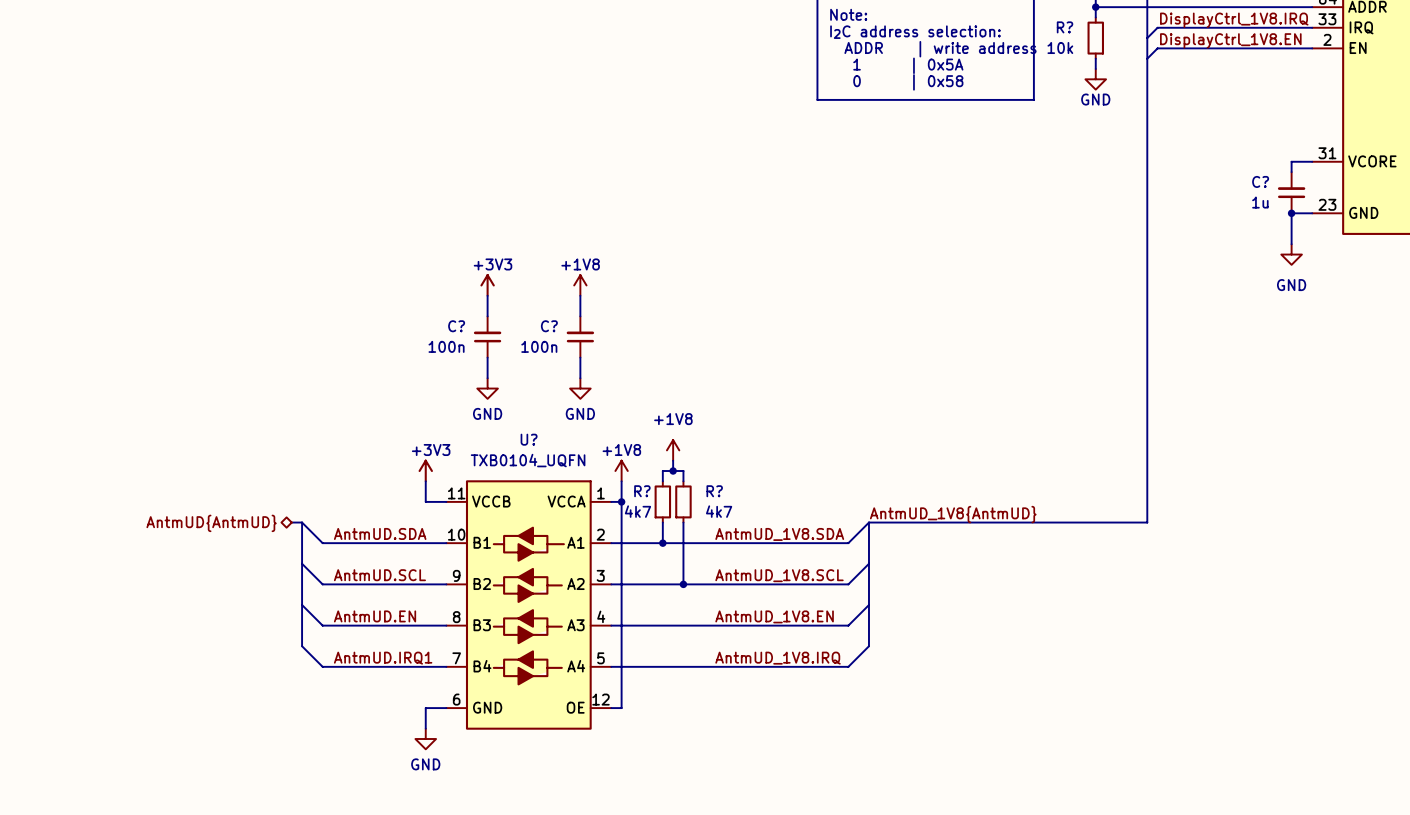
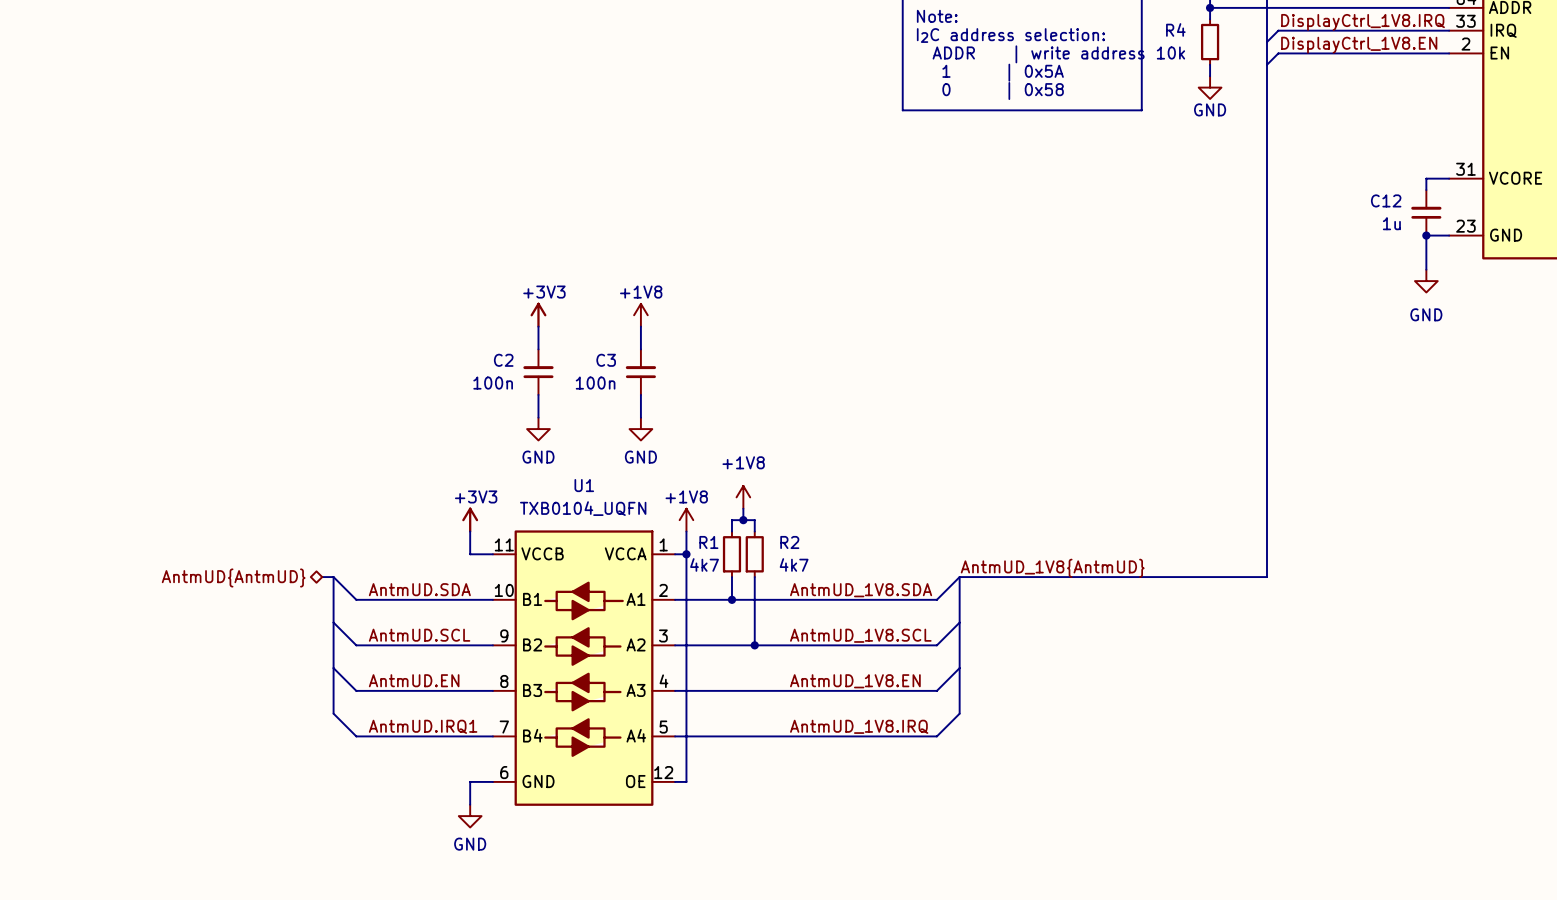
R? name: R? (1065, 27) -> R4 (1175, 29)
C? name: C? (1260, 181) -> C12 (1386, 200)
C? name: C? (456, 326) -> C2 (503, 360)
C? name: C? (549, 326) -> C3 (606, 360)
U? name: U? (529, 439) -> U1 (584, 485)
R? name: R? (642, 491) -> R1 (708, 542)
R? name: R? (714, 491) -> R2 (789, 542)

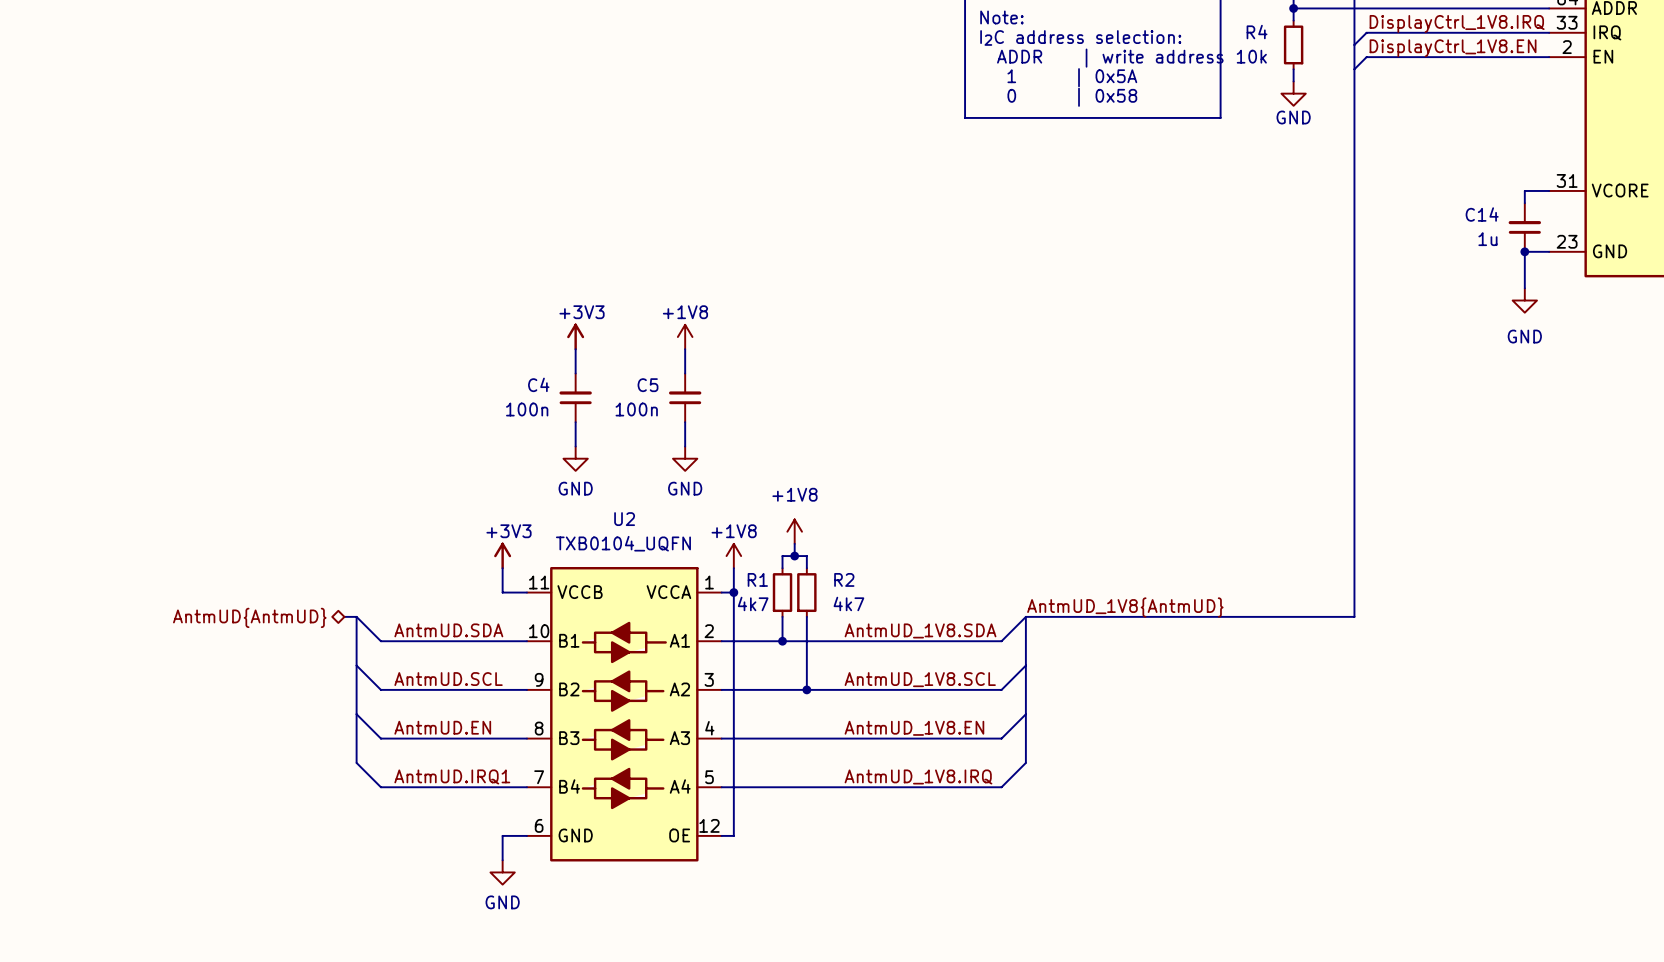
C12 name: C12 (1386, 200) -> C14 (1482, 214)
C2 name: C2 (503, 360) -> C4 (538, 384)
C3 name: C3 (606, 360) -> C5 (648, 385)
U1 name: U1 (584, 485) -> U2 (624, 519)

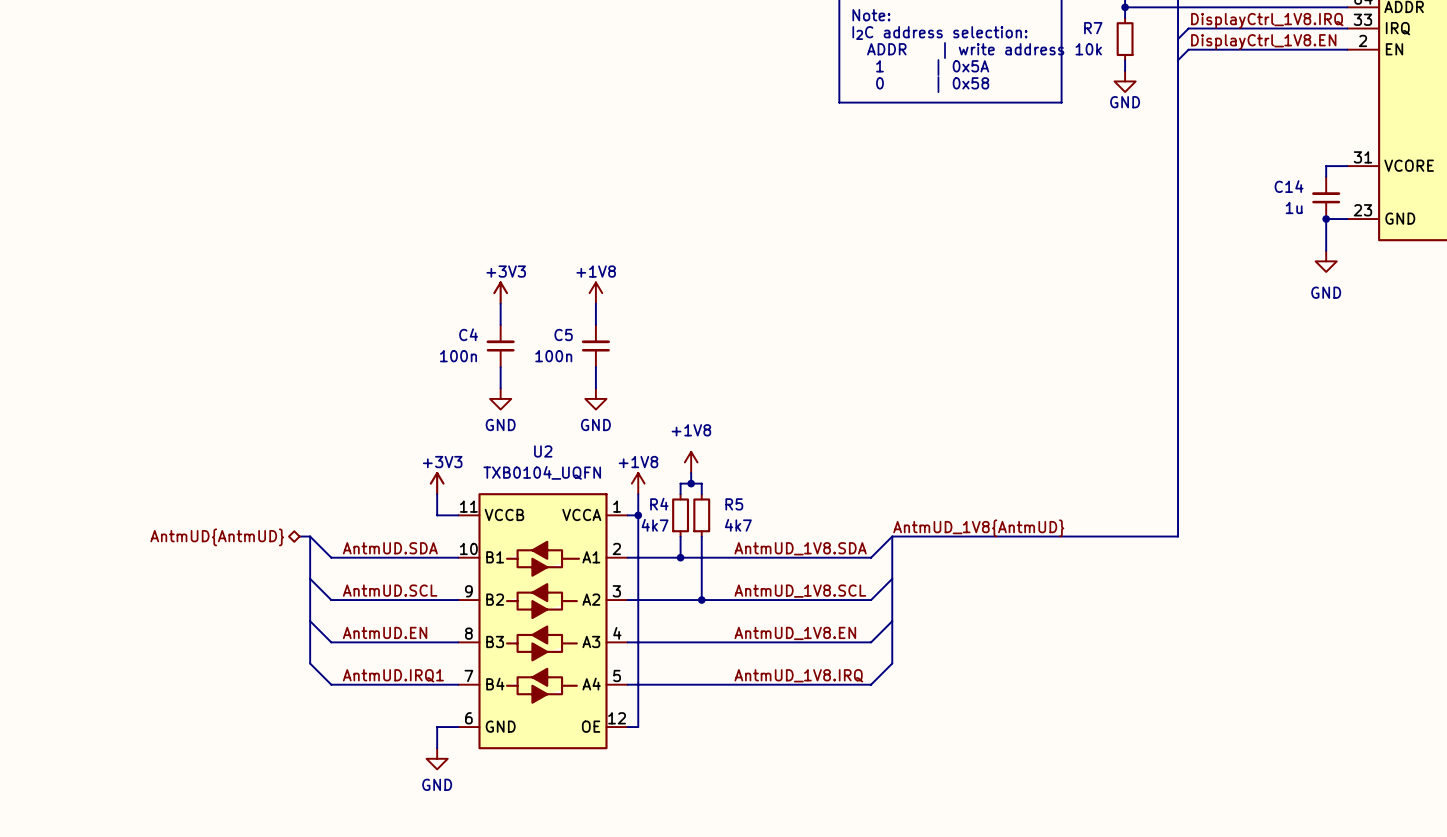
R4 name: R4 (1257, 32) -> R7 (1093, 28)
R1 name: R1 (757, 579) -> R4 (659, 504)
R2 name: R2 (844, 579) -> R5 (734, 504)

